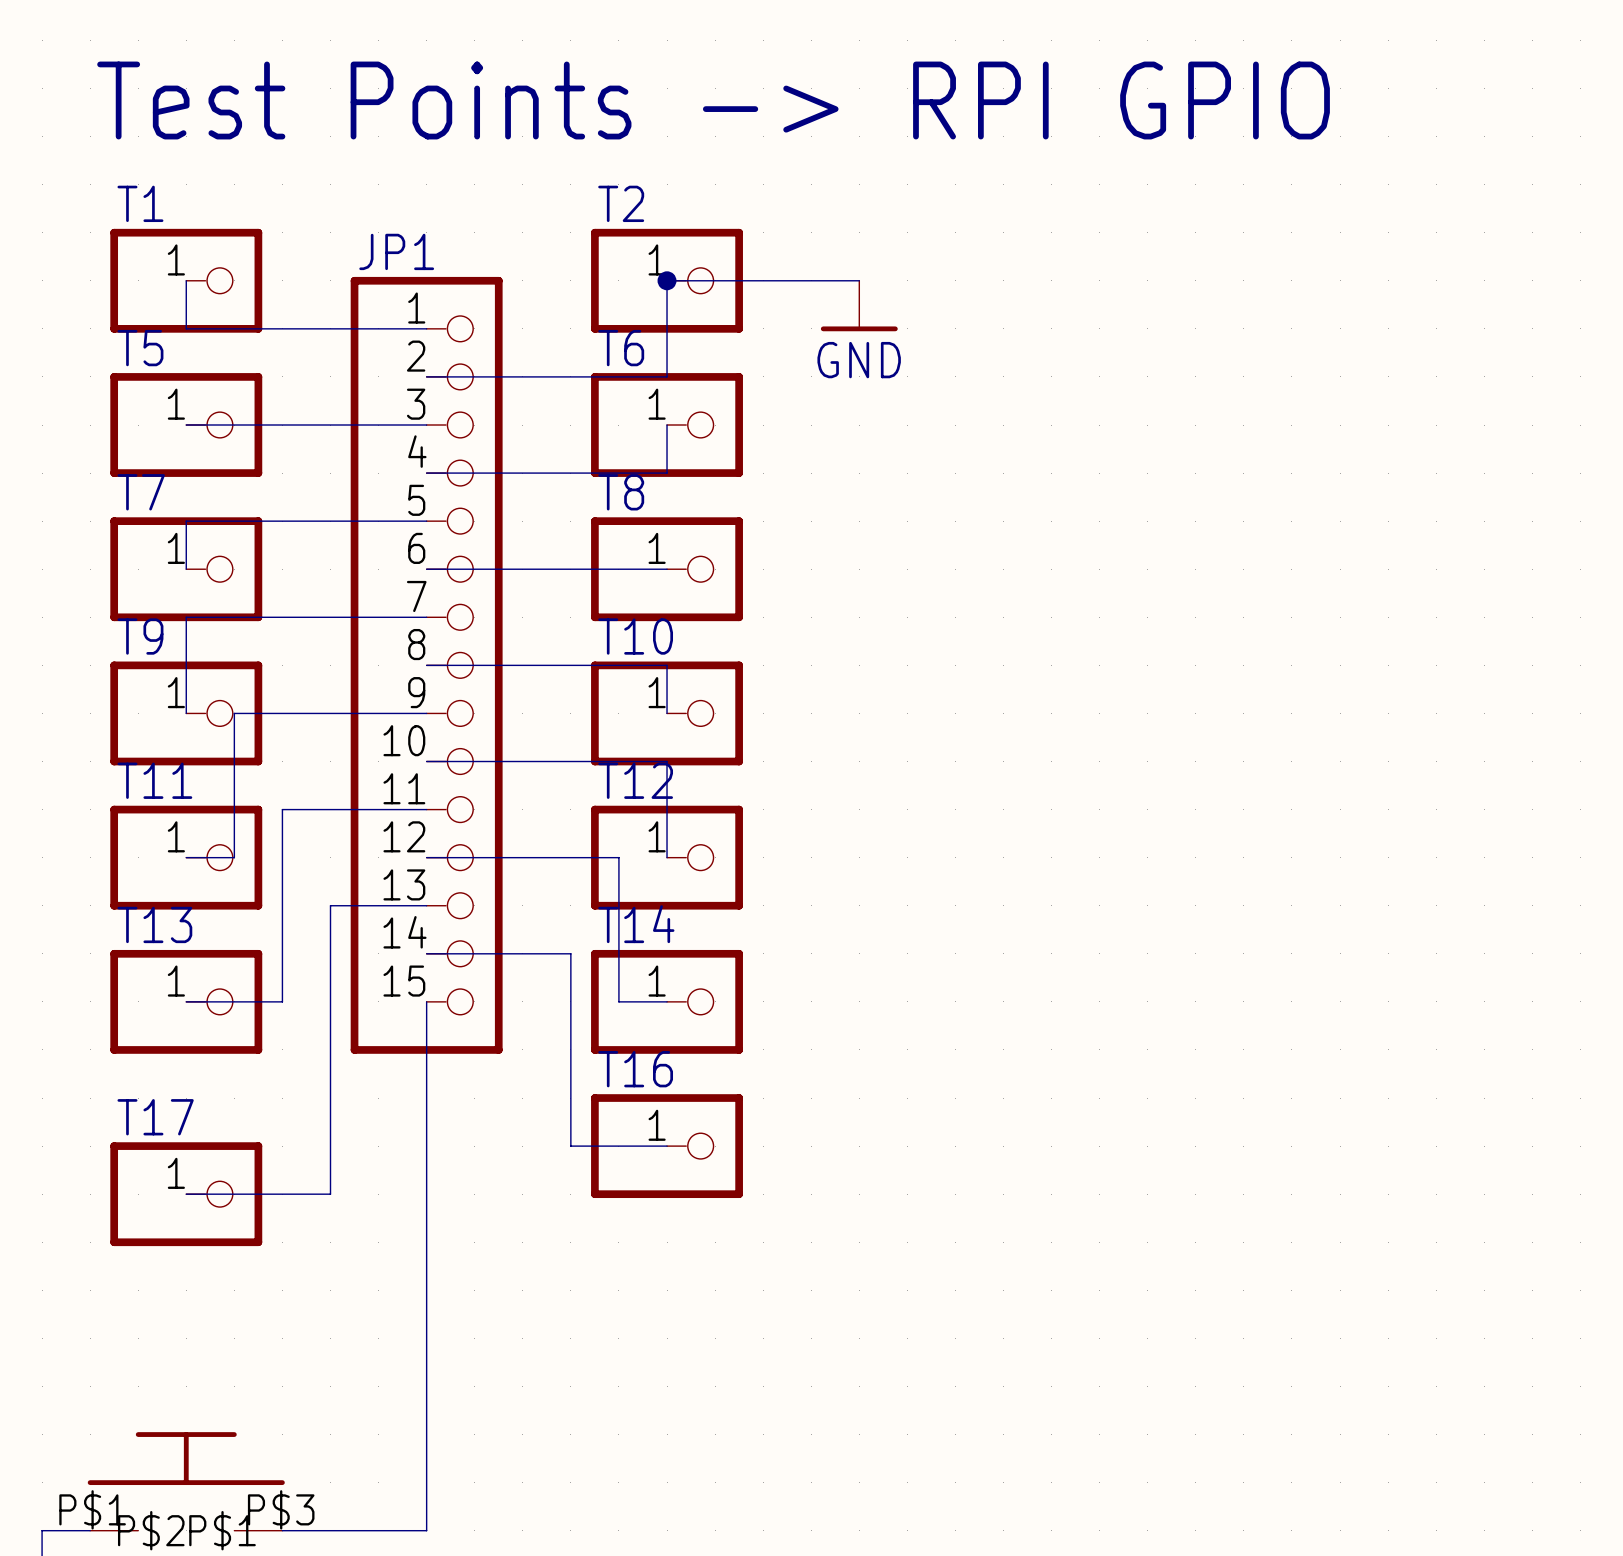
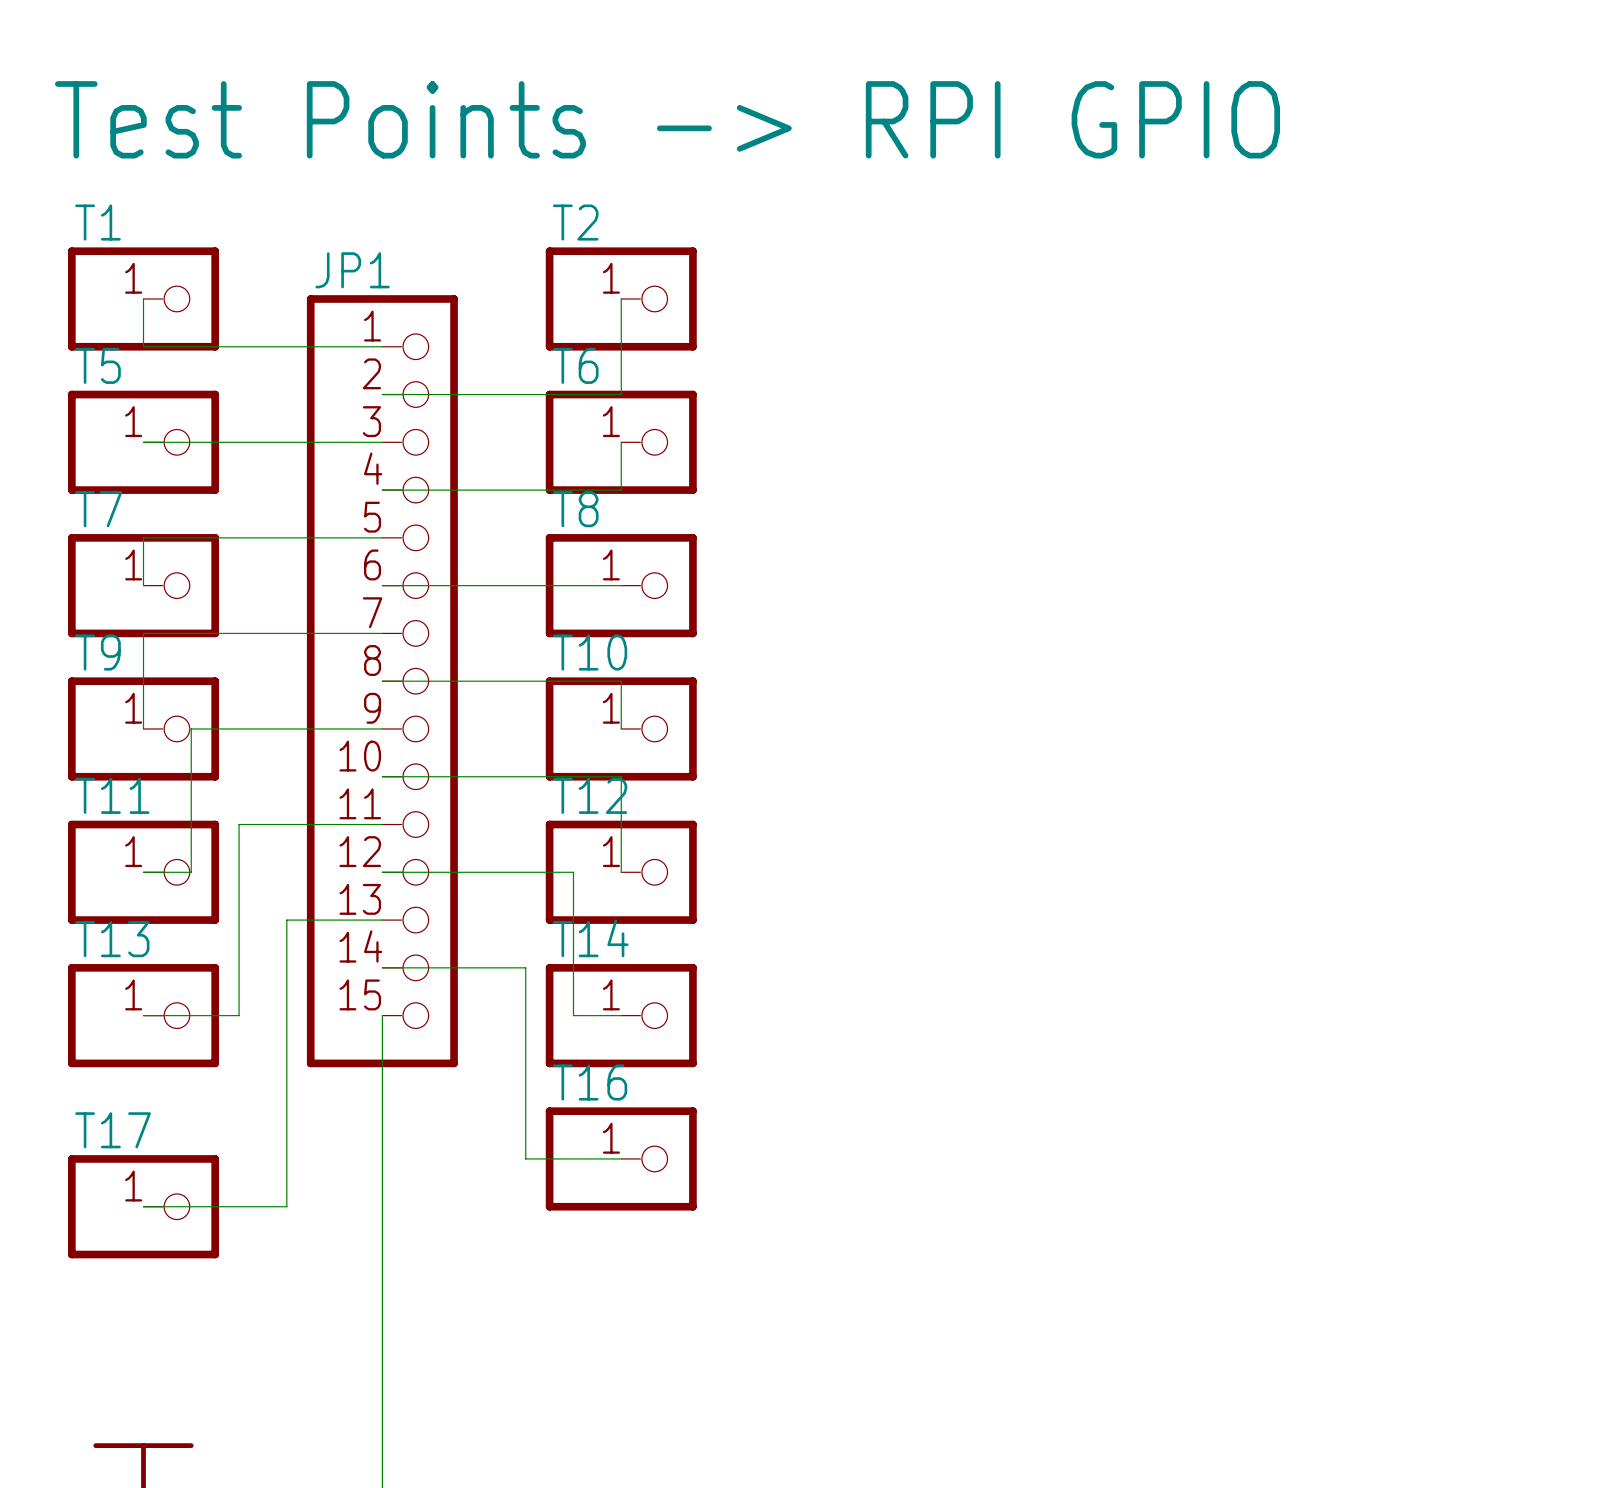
wire: (667, 280) (859, 280) -> none
junction: (667, 280) -> none
power symbol: GND (859, 306) -> none

